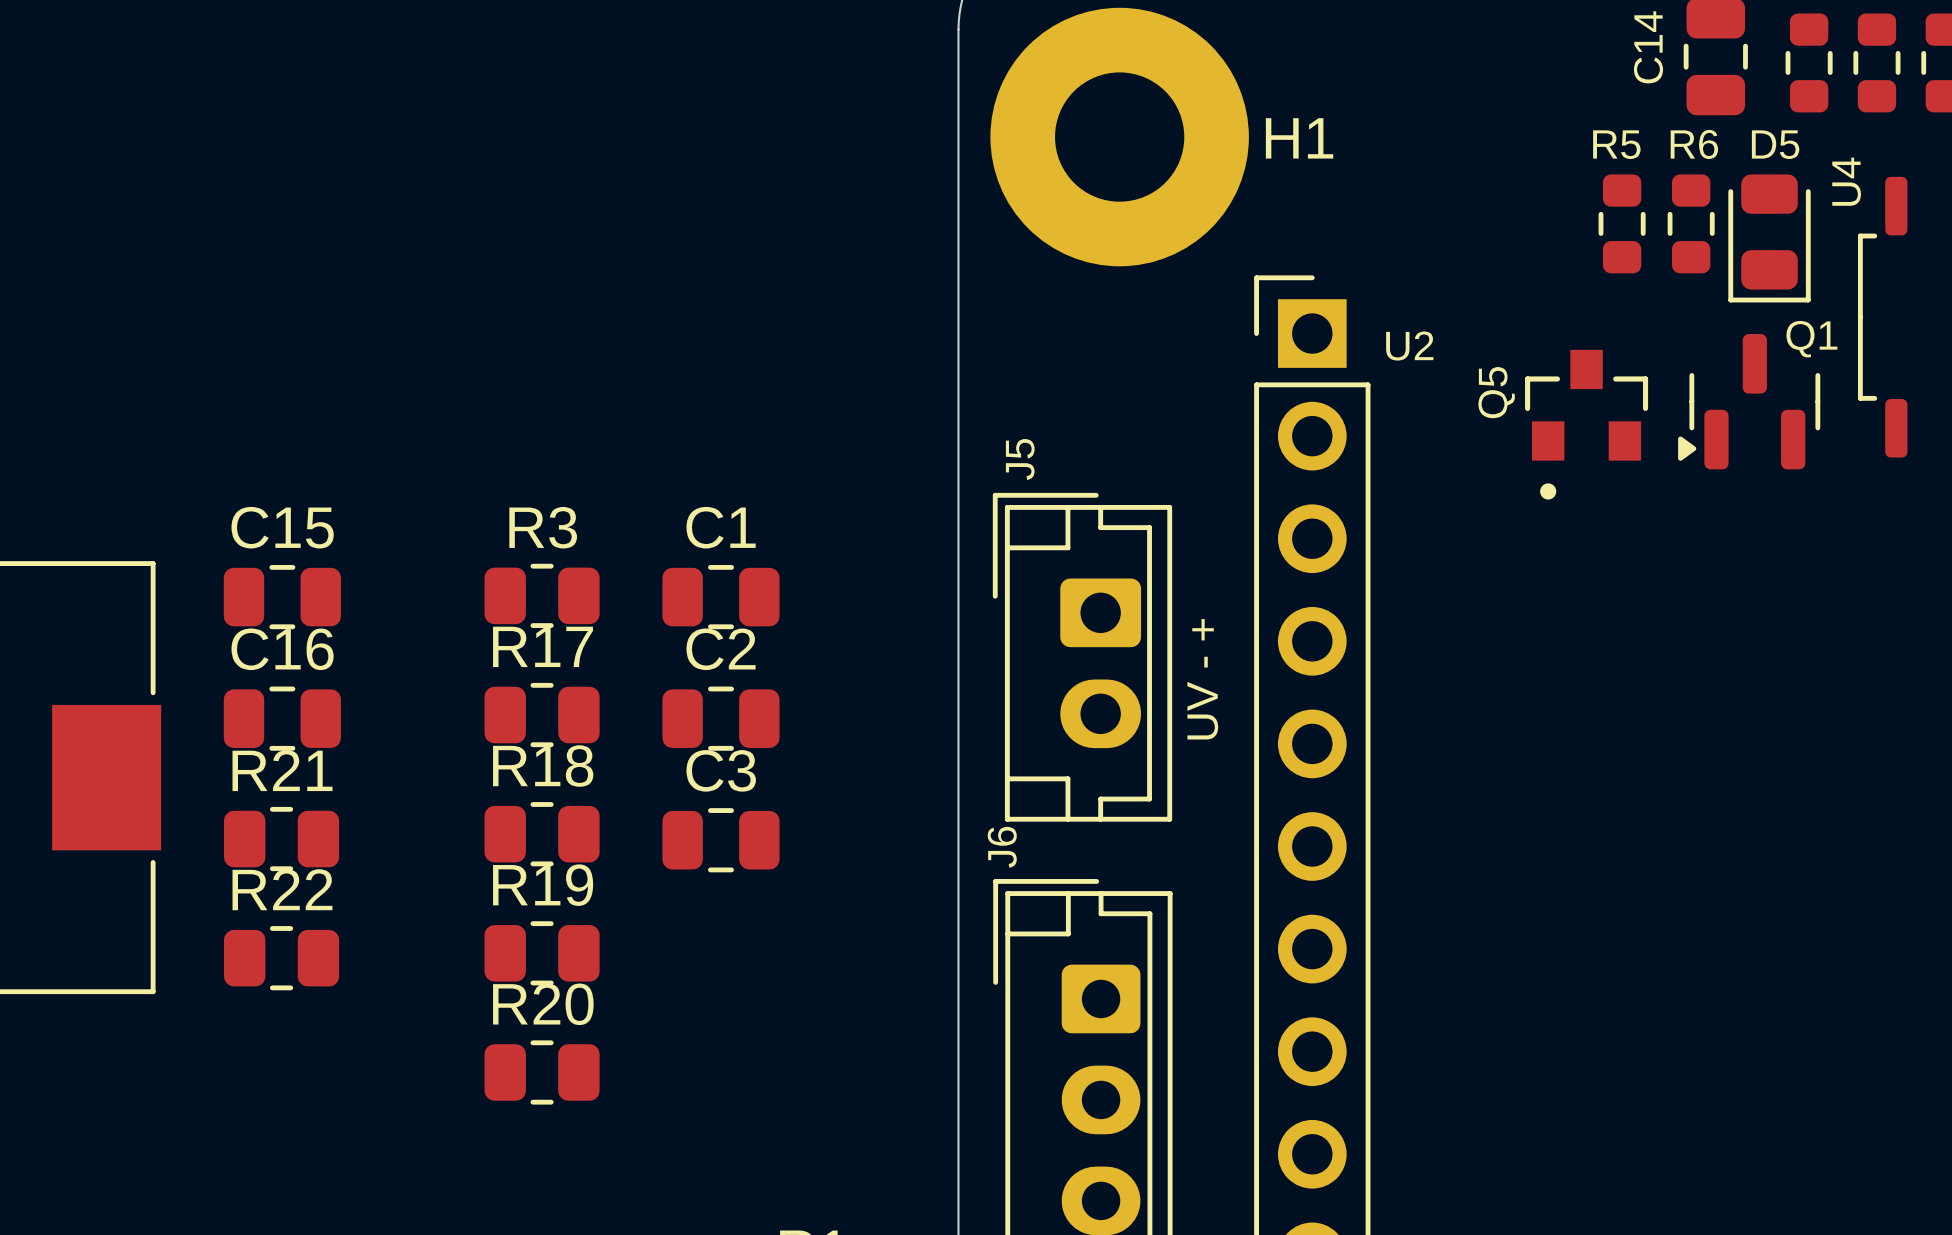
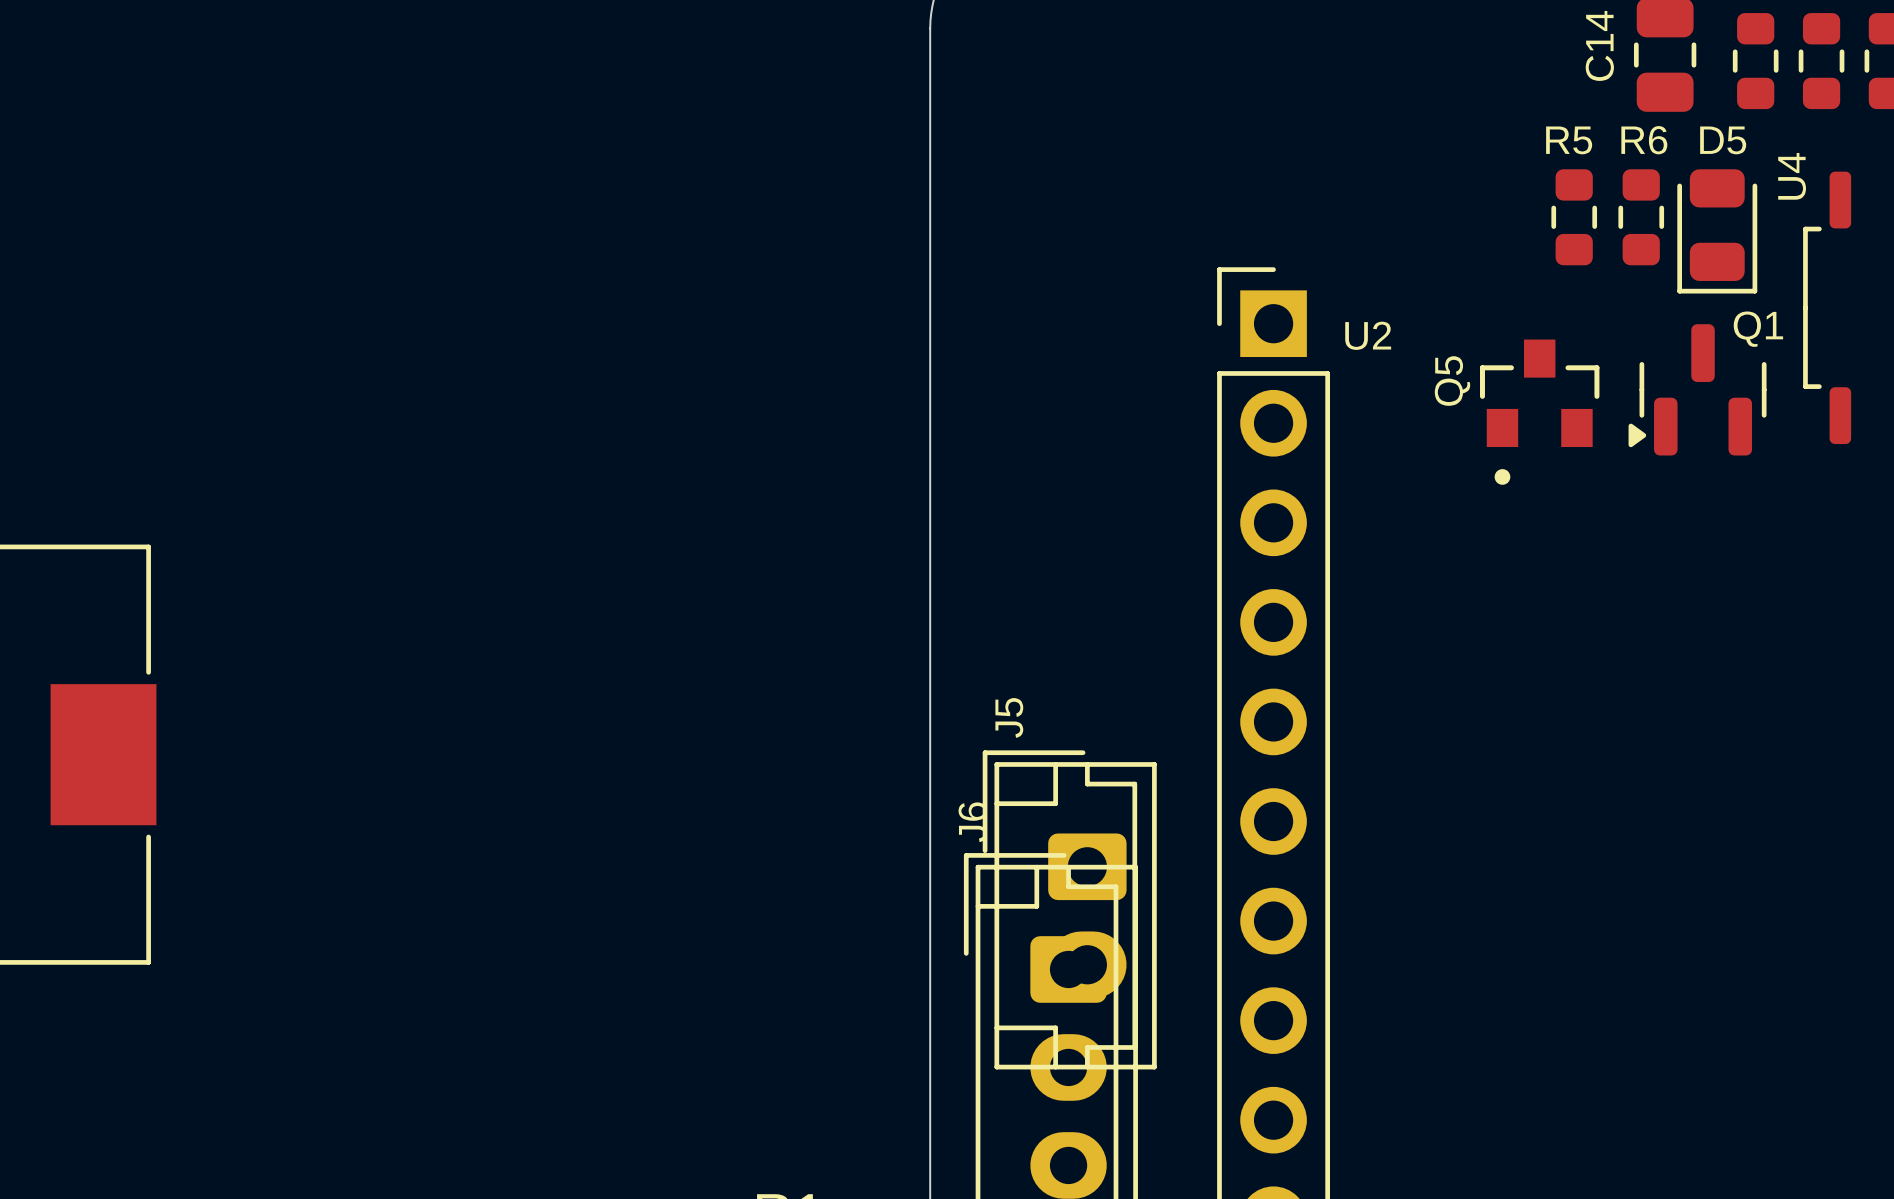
H1: (1119, 137) -> none
R3: (542, 595) -> none
C15: (282, 597) -> none
C1: (721, 597) -> none
J5 position: (1082, 657) -> (1069, 909)
text: UV - + (1202, 679) -> none
R17: (542, 715) -> none
C16: (282, 718) -> none
C2: (721, 718) -> none
R18: (542, 834) -> none
R21: (281, 839) -> none
C3: (721, 840) -> none
R19: (542, 953) -> none
R22: (281, 958) -> none
R20: (542, 1072) -> none

